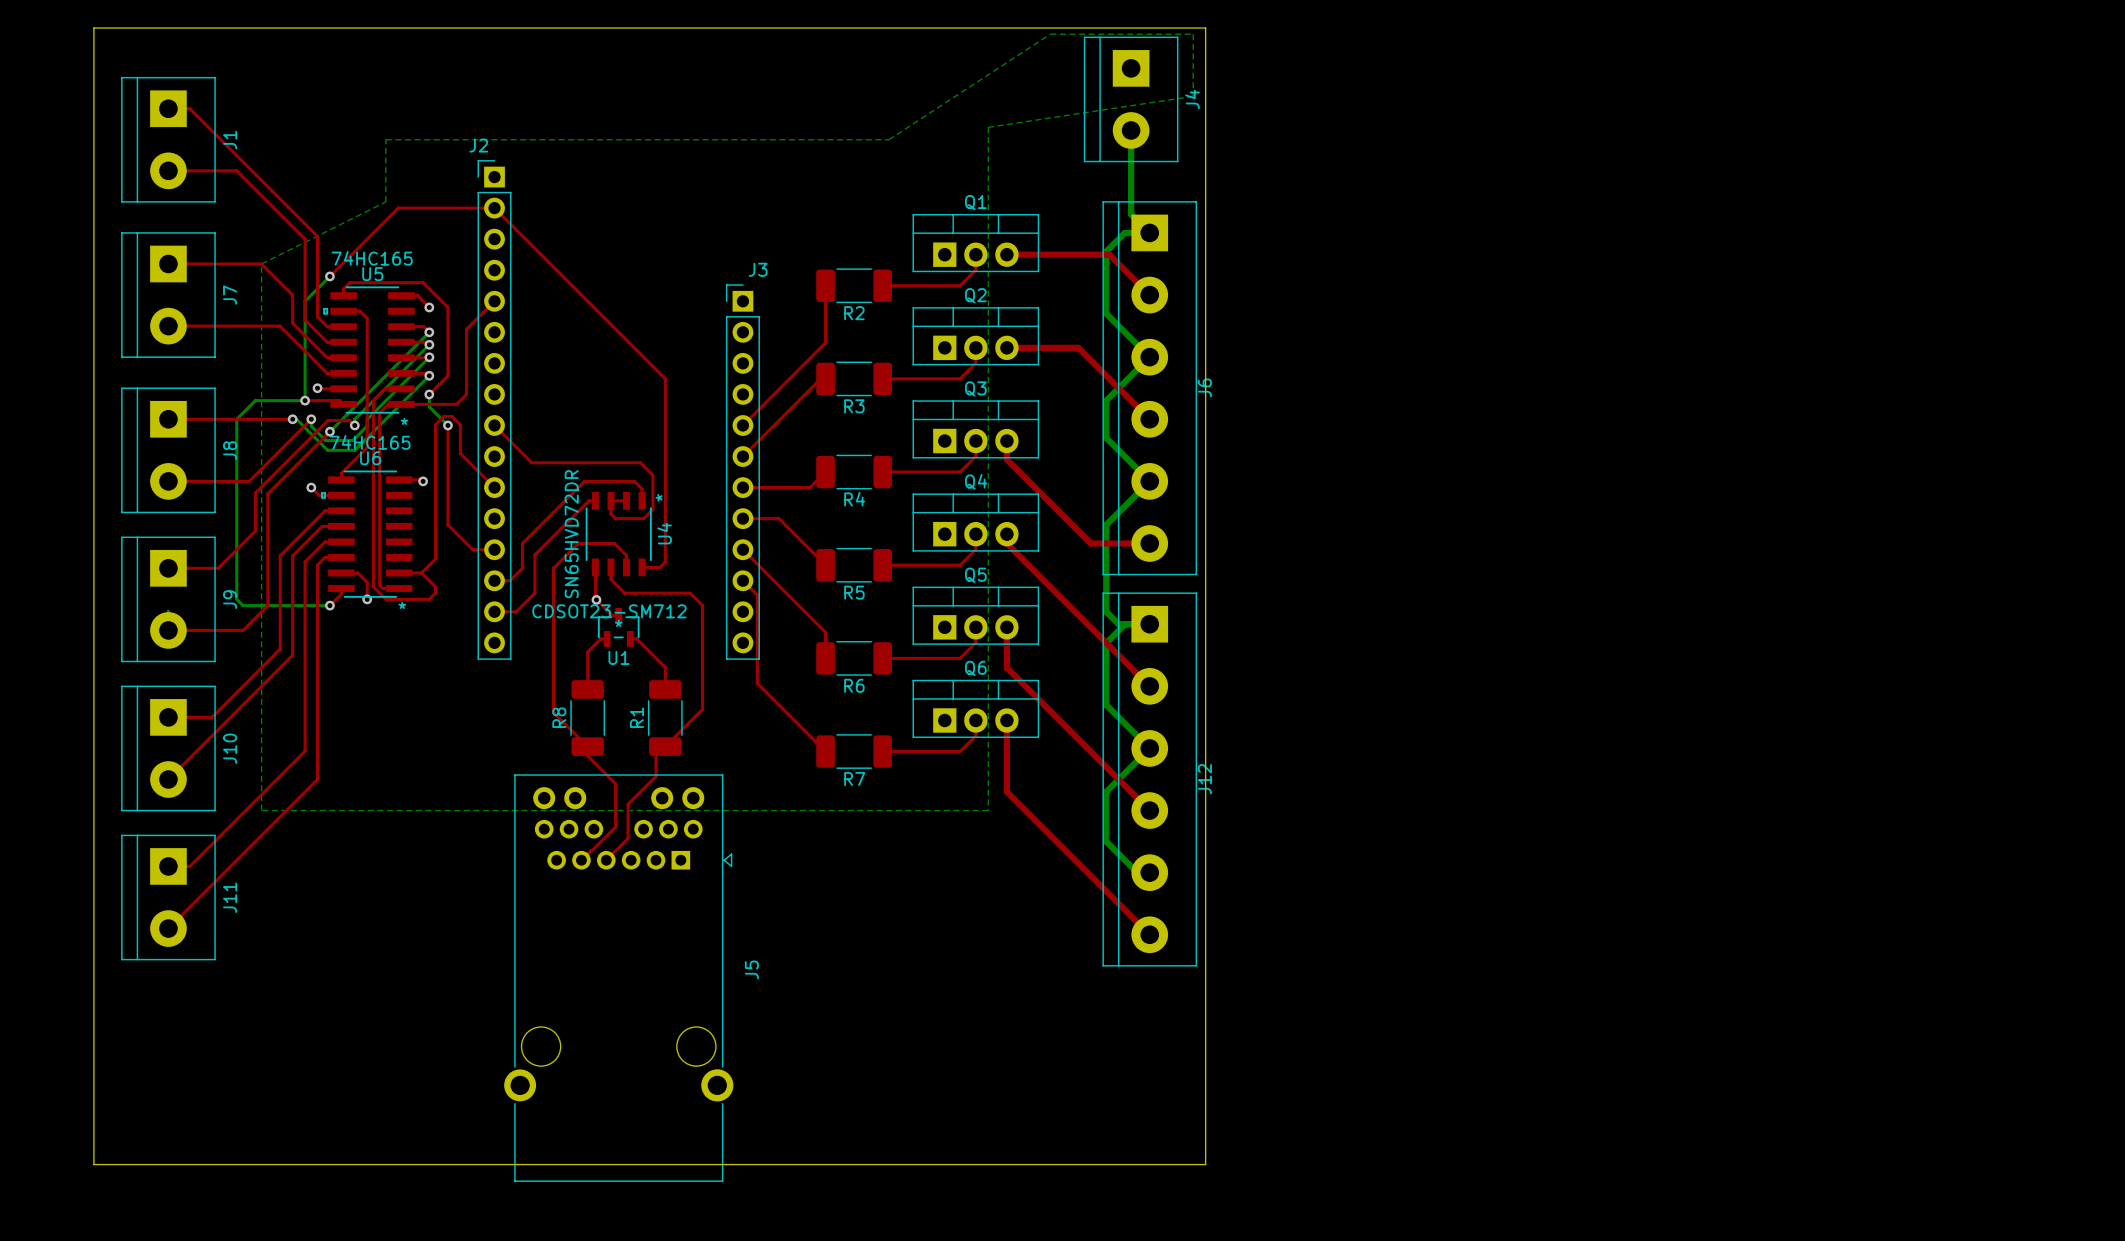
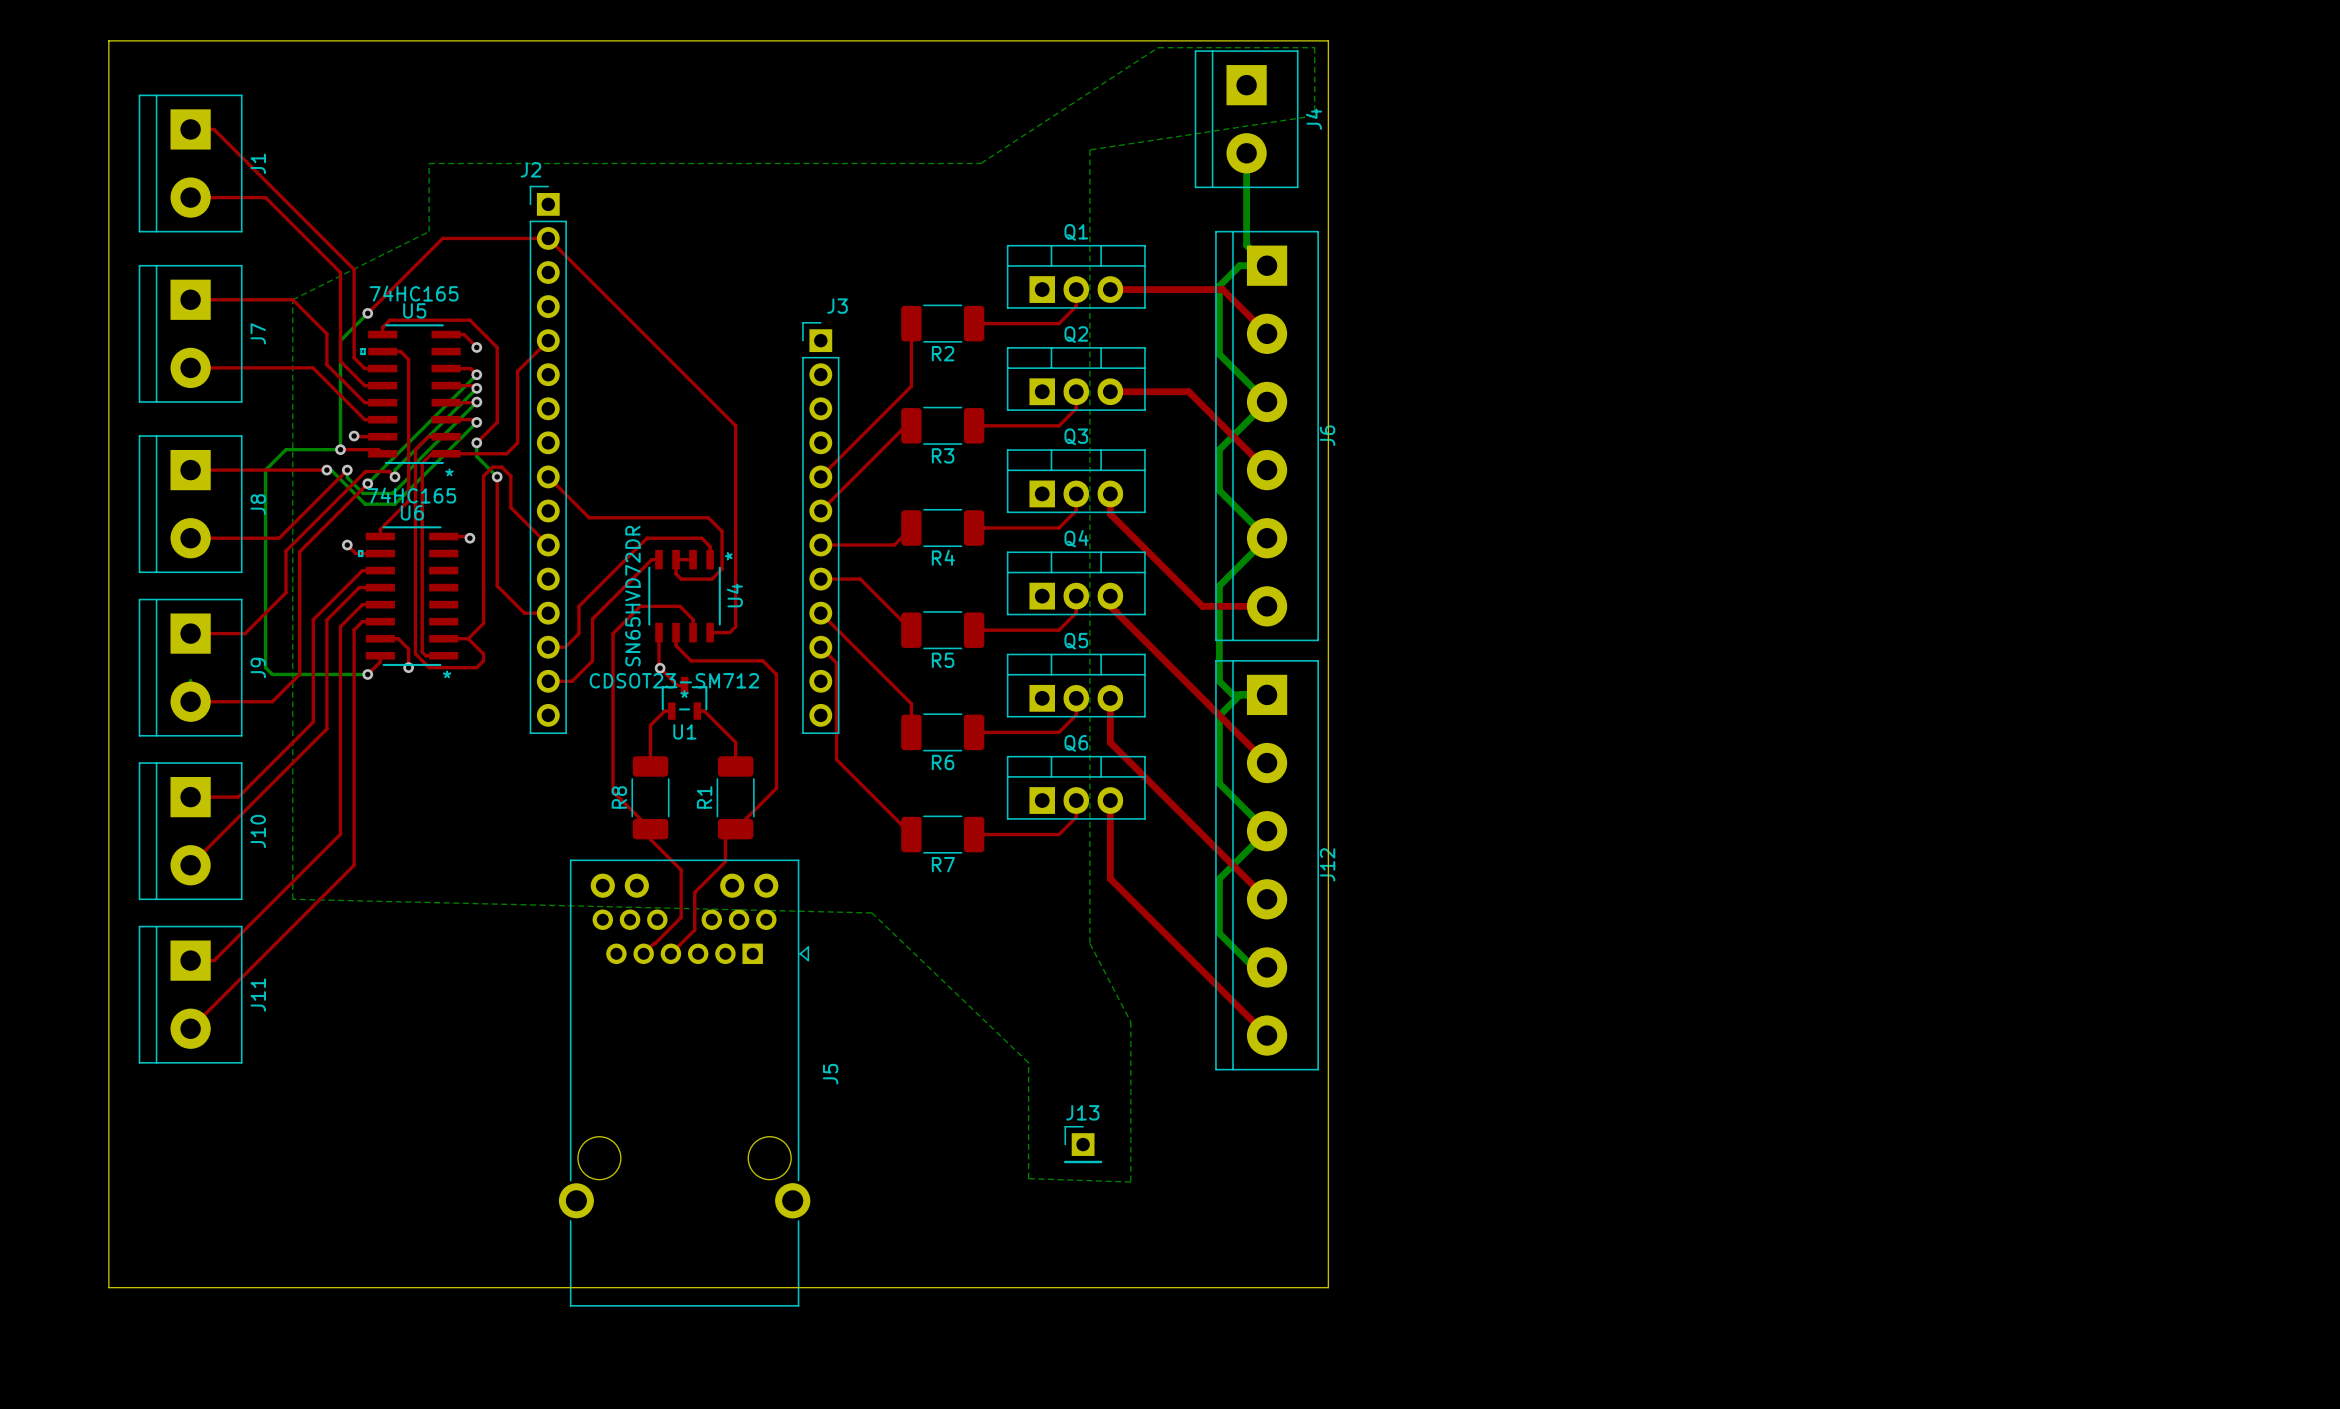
bottom zone outline: (261, 810) (988, 810) -> (292, 899) (871, 912) (1028, 1062) (1028, 1178) (1130, 1182) (1130, 1021) (1089, 943) (1089, 899)
J13: none -> (1083, 1144)

